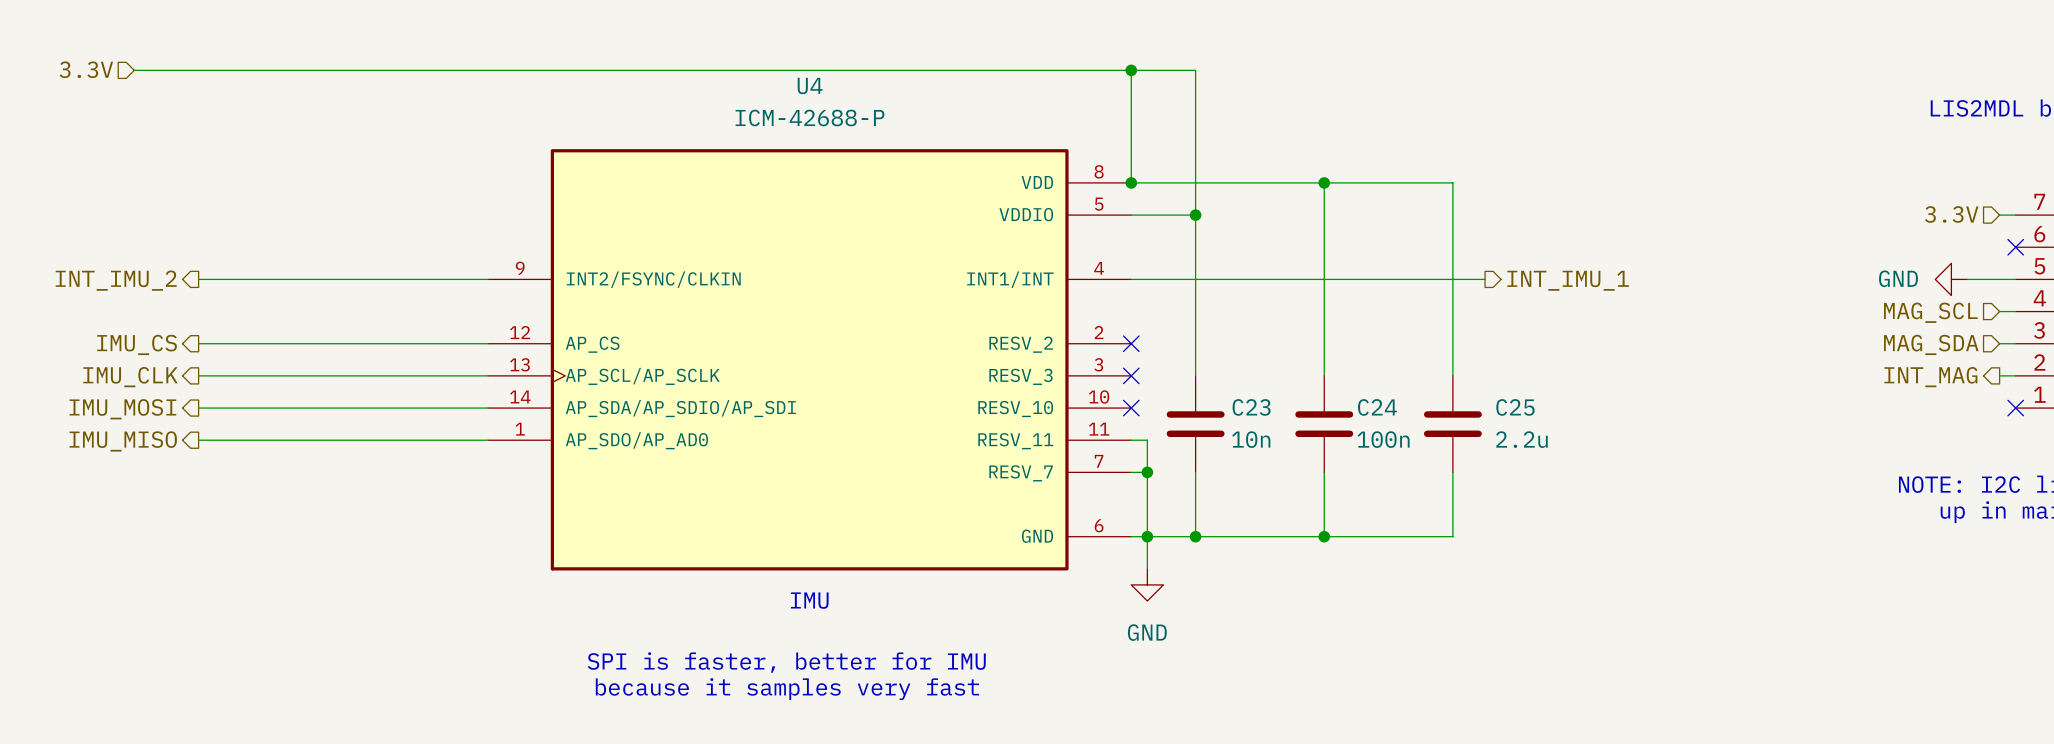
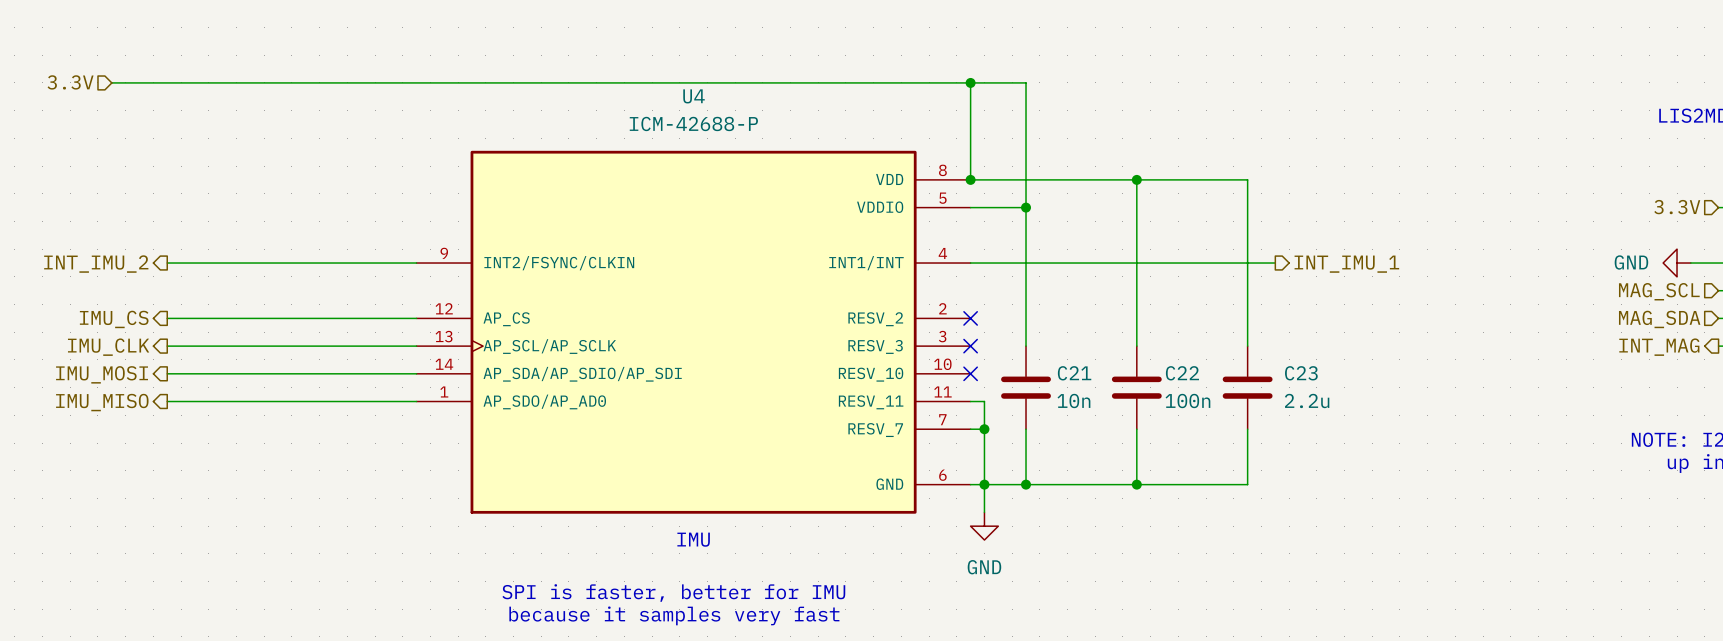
C23 name: C23 (1251, 407) -> C21 (1074, 373)
C24 name: C24 (1377, 407) -> C22 (1182, 373)
C25 name: C25 (1515, 407) -> C23 (1301, 373)

